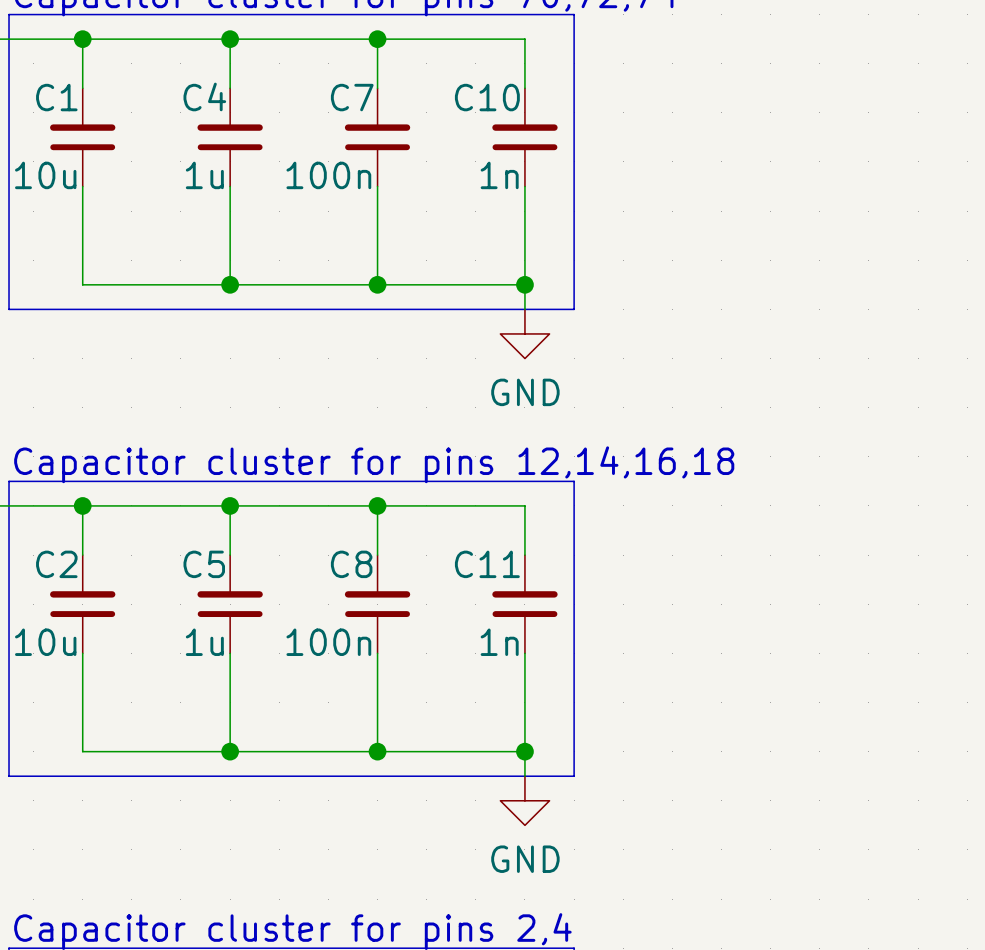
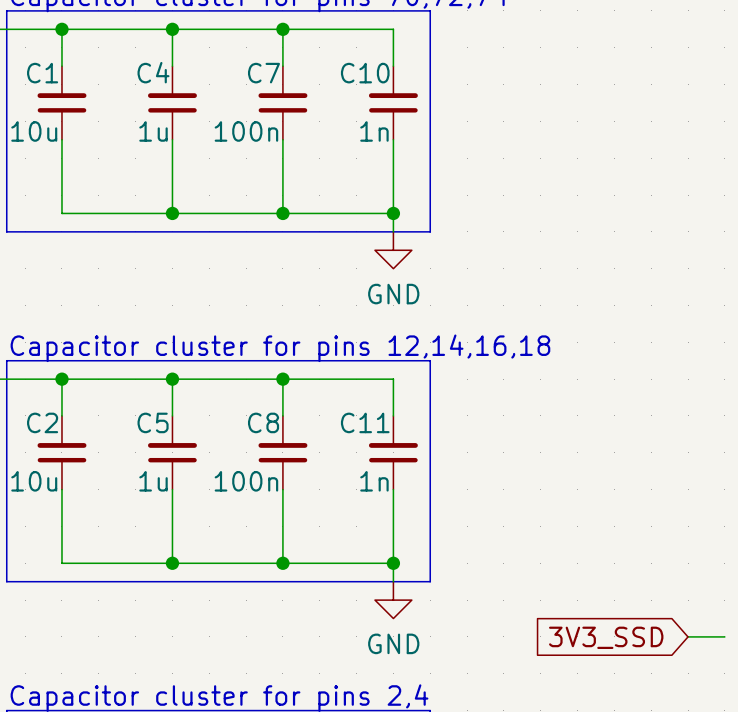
wire: none -> (688, 636) (724, 636)
global label: none -> 3V3_SSD (606, 637)

